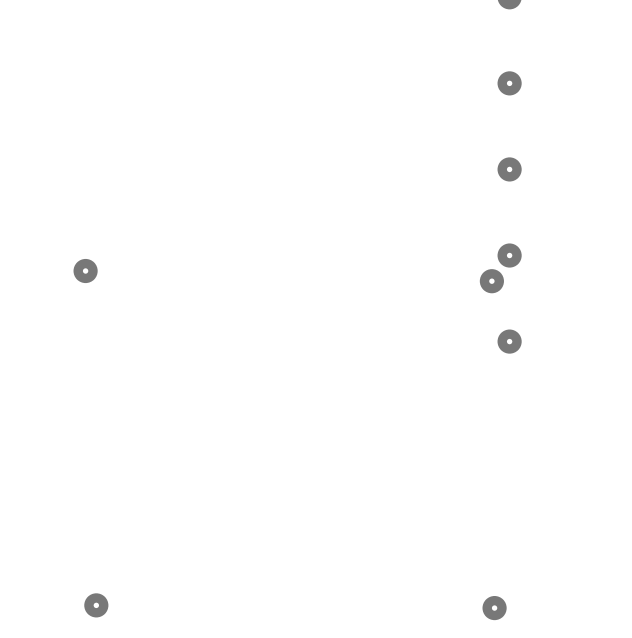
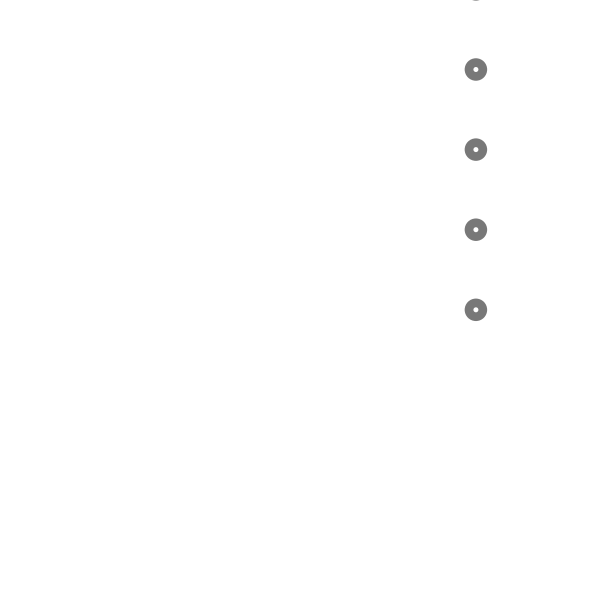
via: (85, 271) -> none
via: (491, 281) -> none
via: (96, 605) -> none
via: (494, 608) -> none

